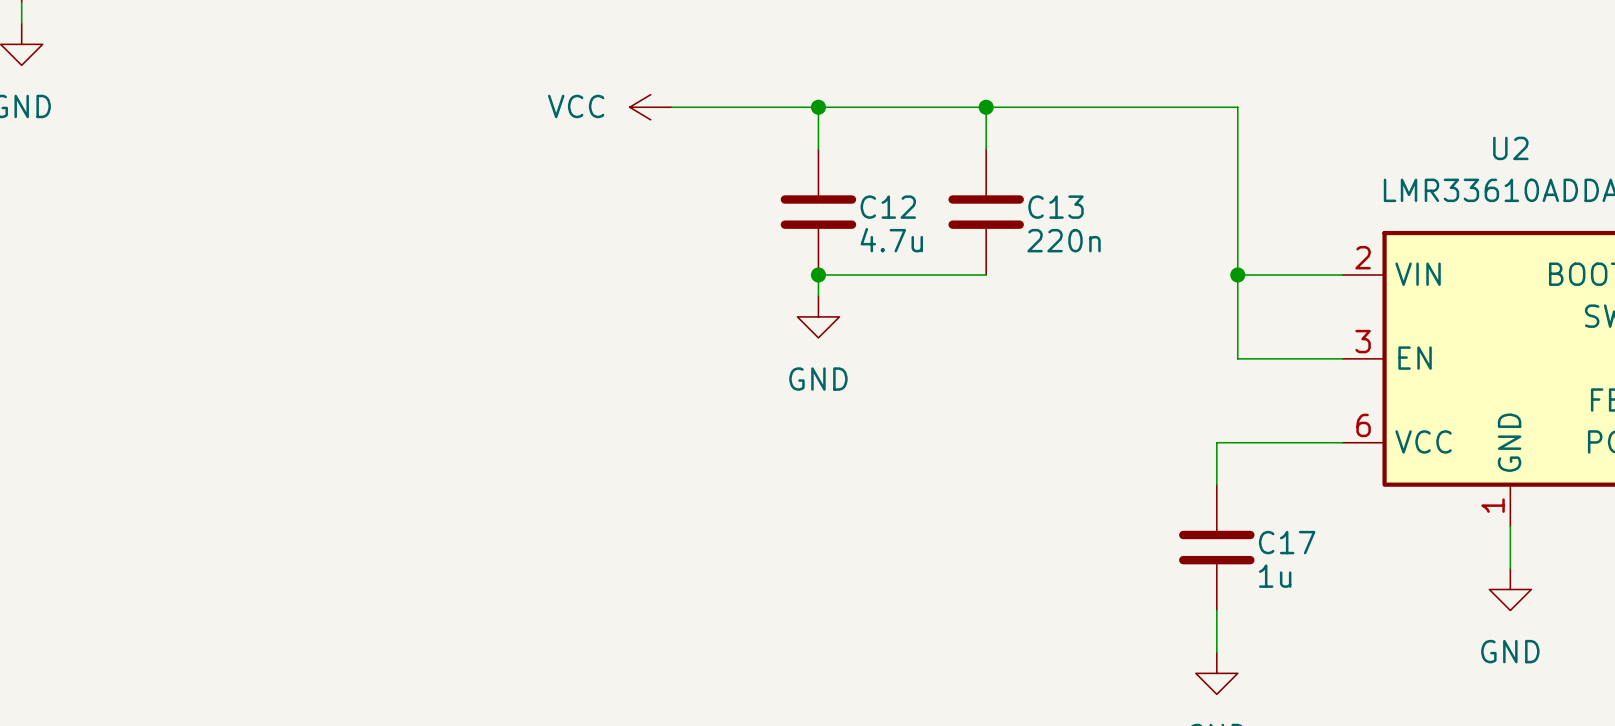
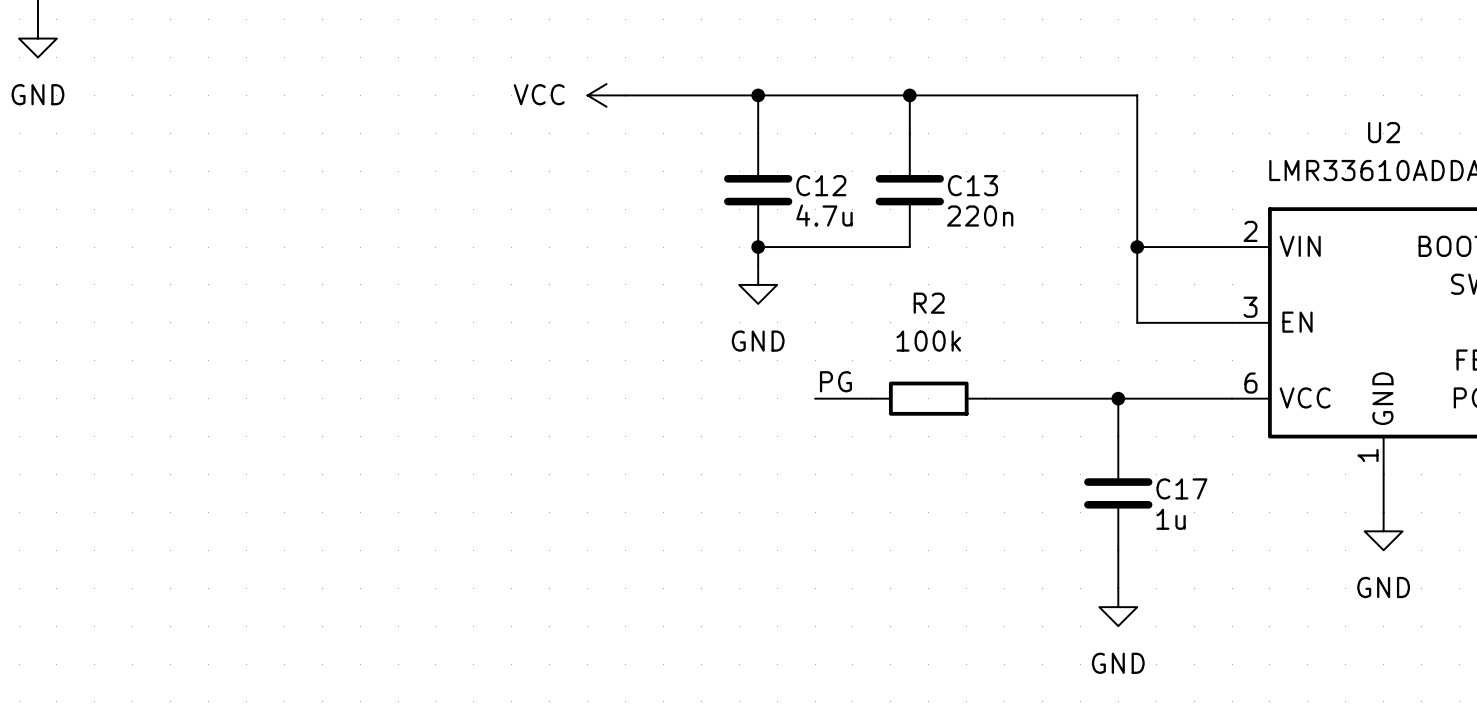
label: none -> PG (835, 381)
wire: none -> (815, 398) (871, 398)
R2: none -> 100k (928, 398)
wire: none -> (985, 398) (1118, 398)
junction: none -> (1118, 398)

